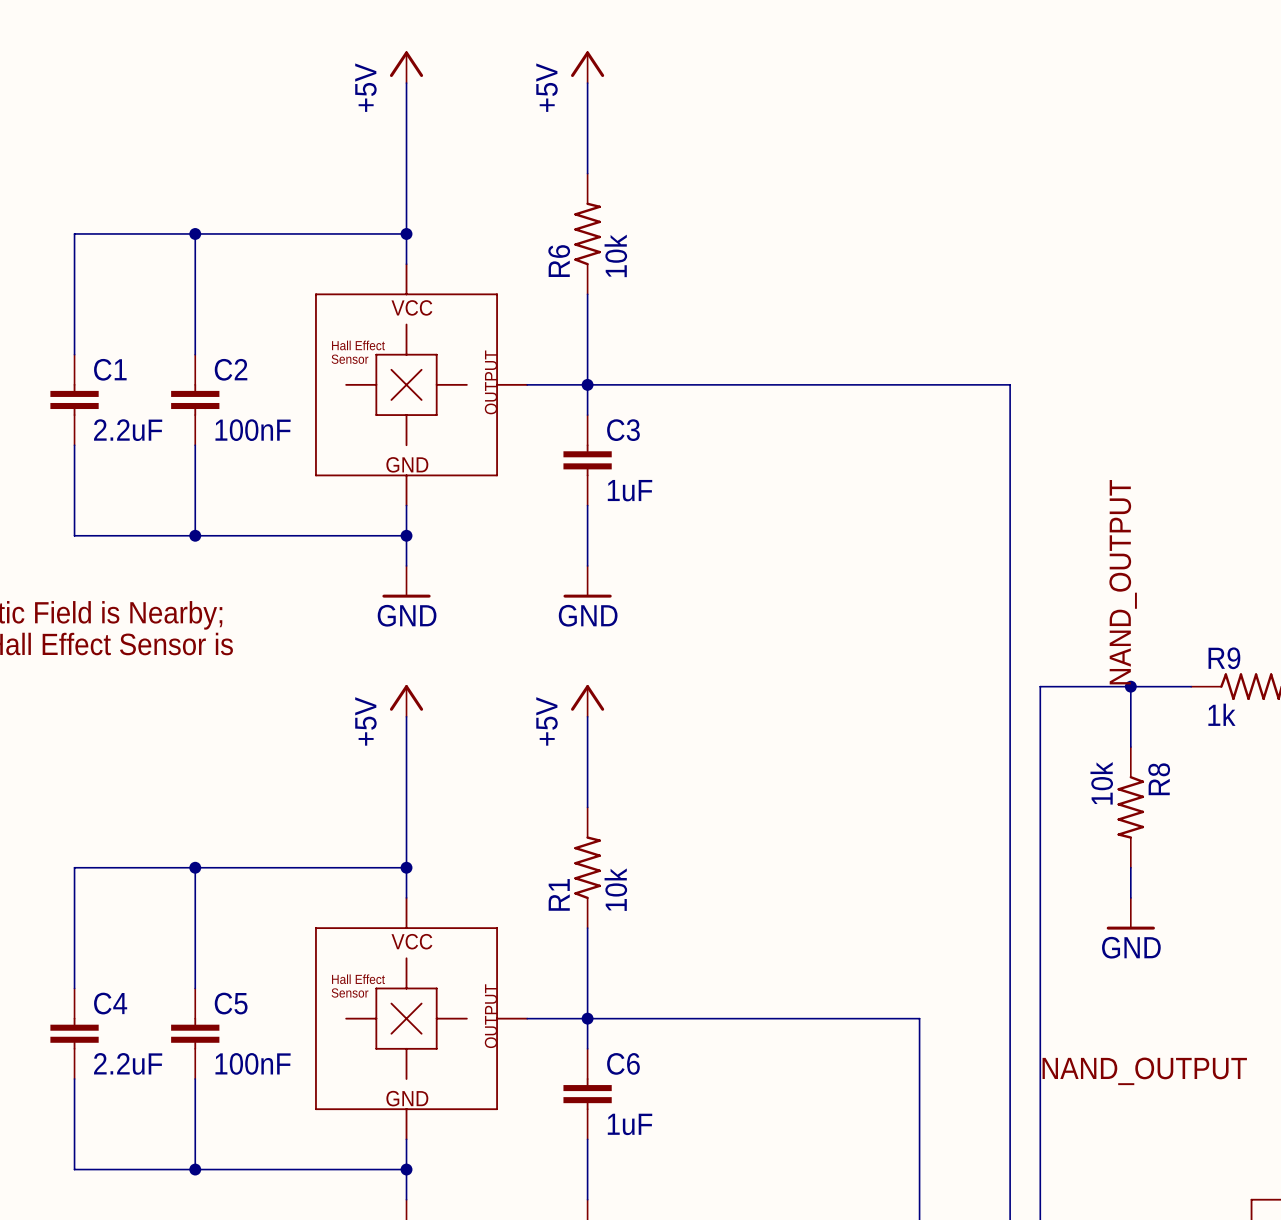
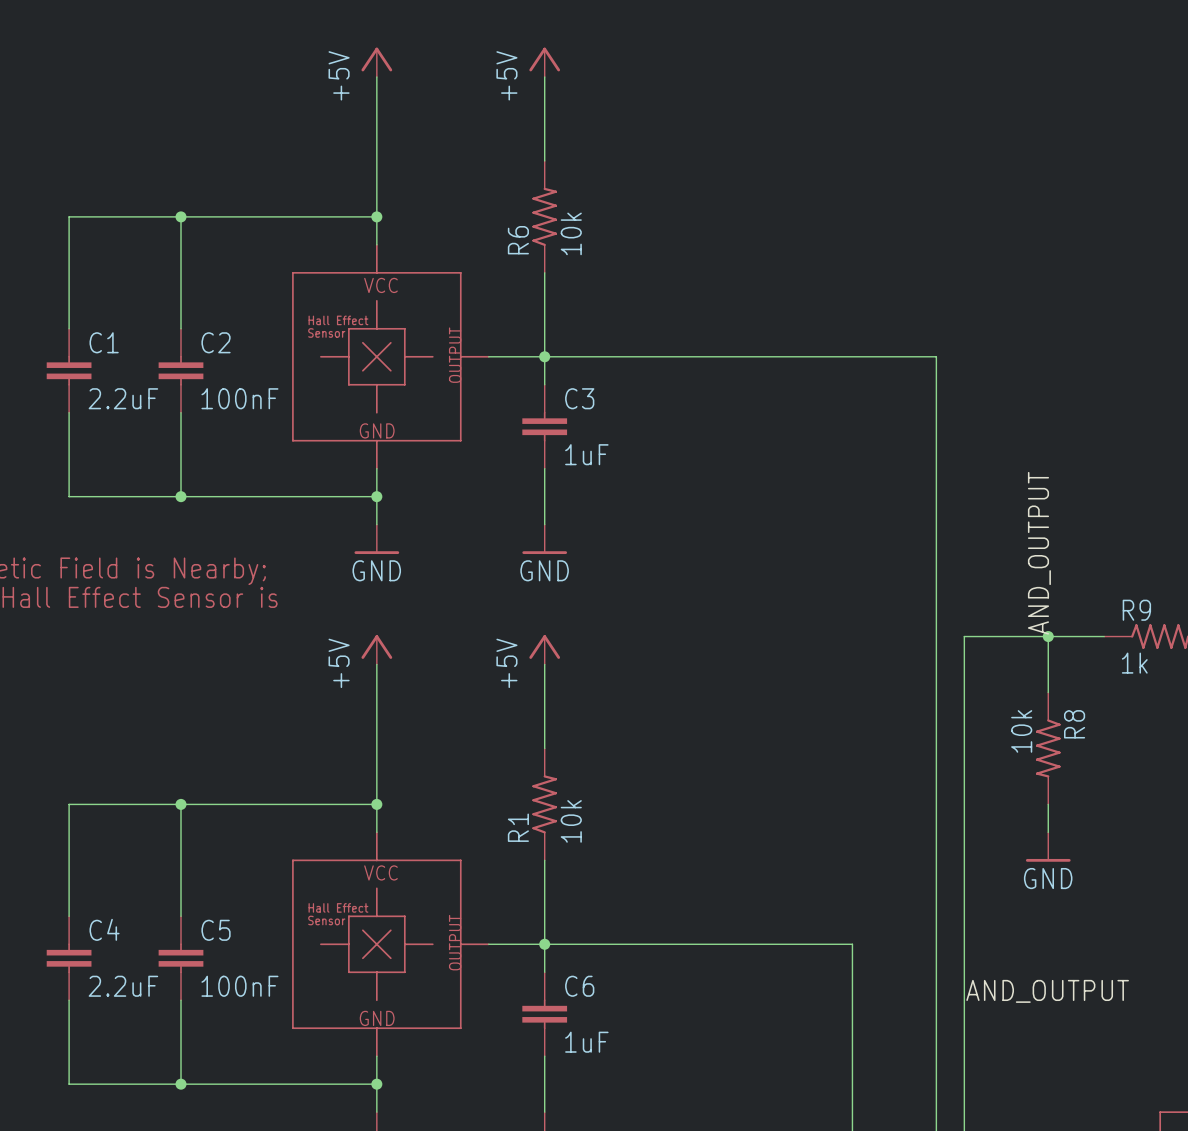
label: NAND_OUTPUT (1123, 582) -> AND_OUTPUT (1039, 553)
label: NAND_OUTPUT (1144, 1071) -> AND_OUTPUT (1047, 991)

